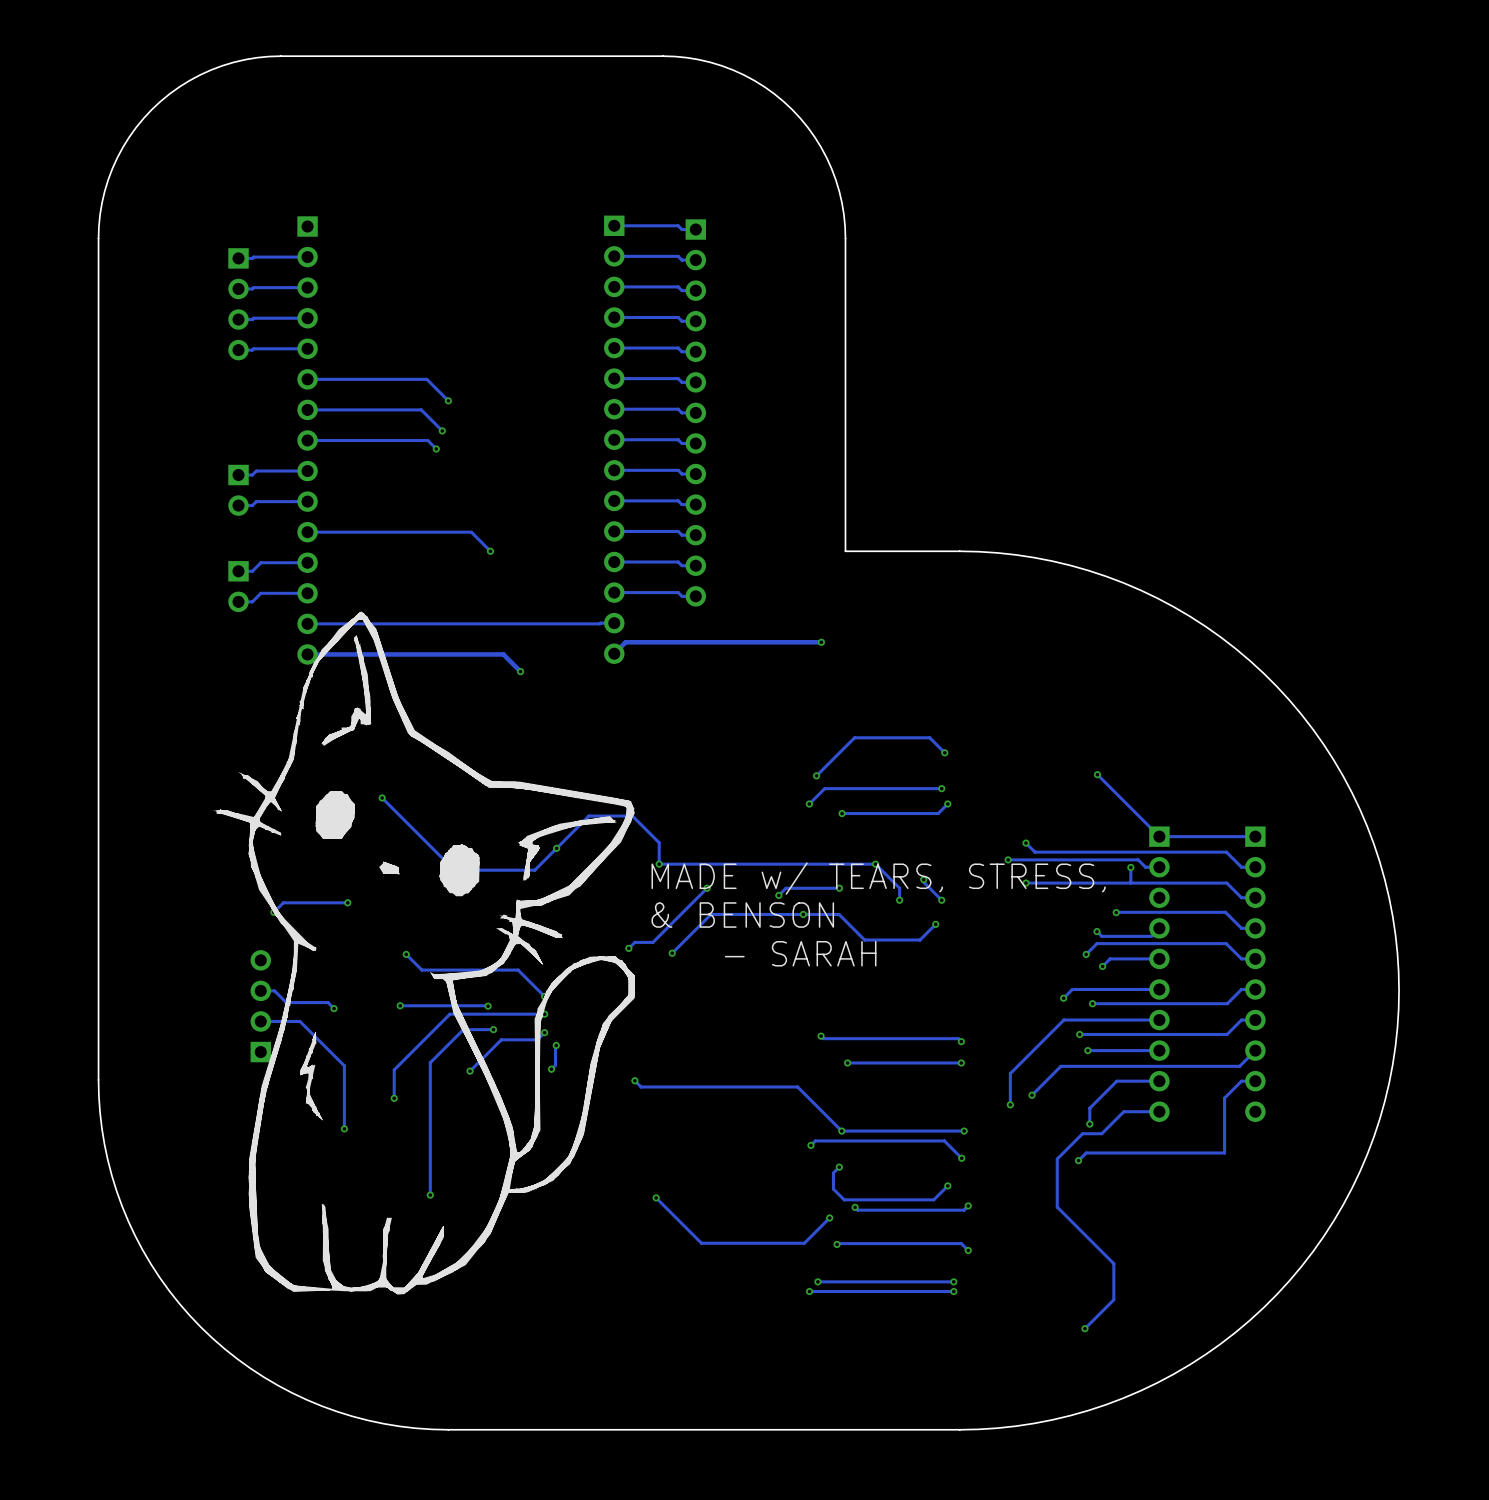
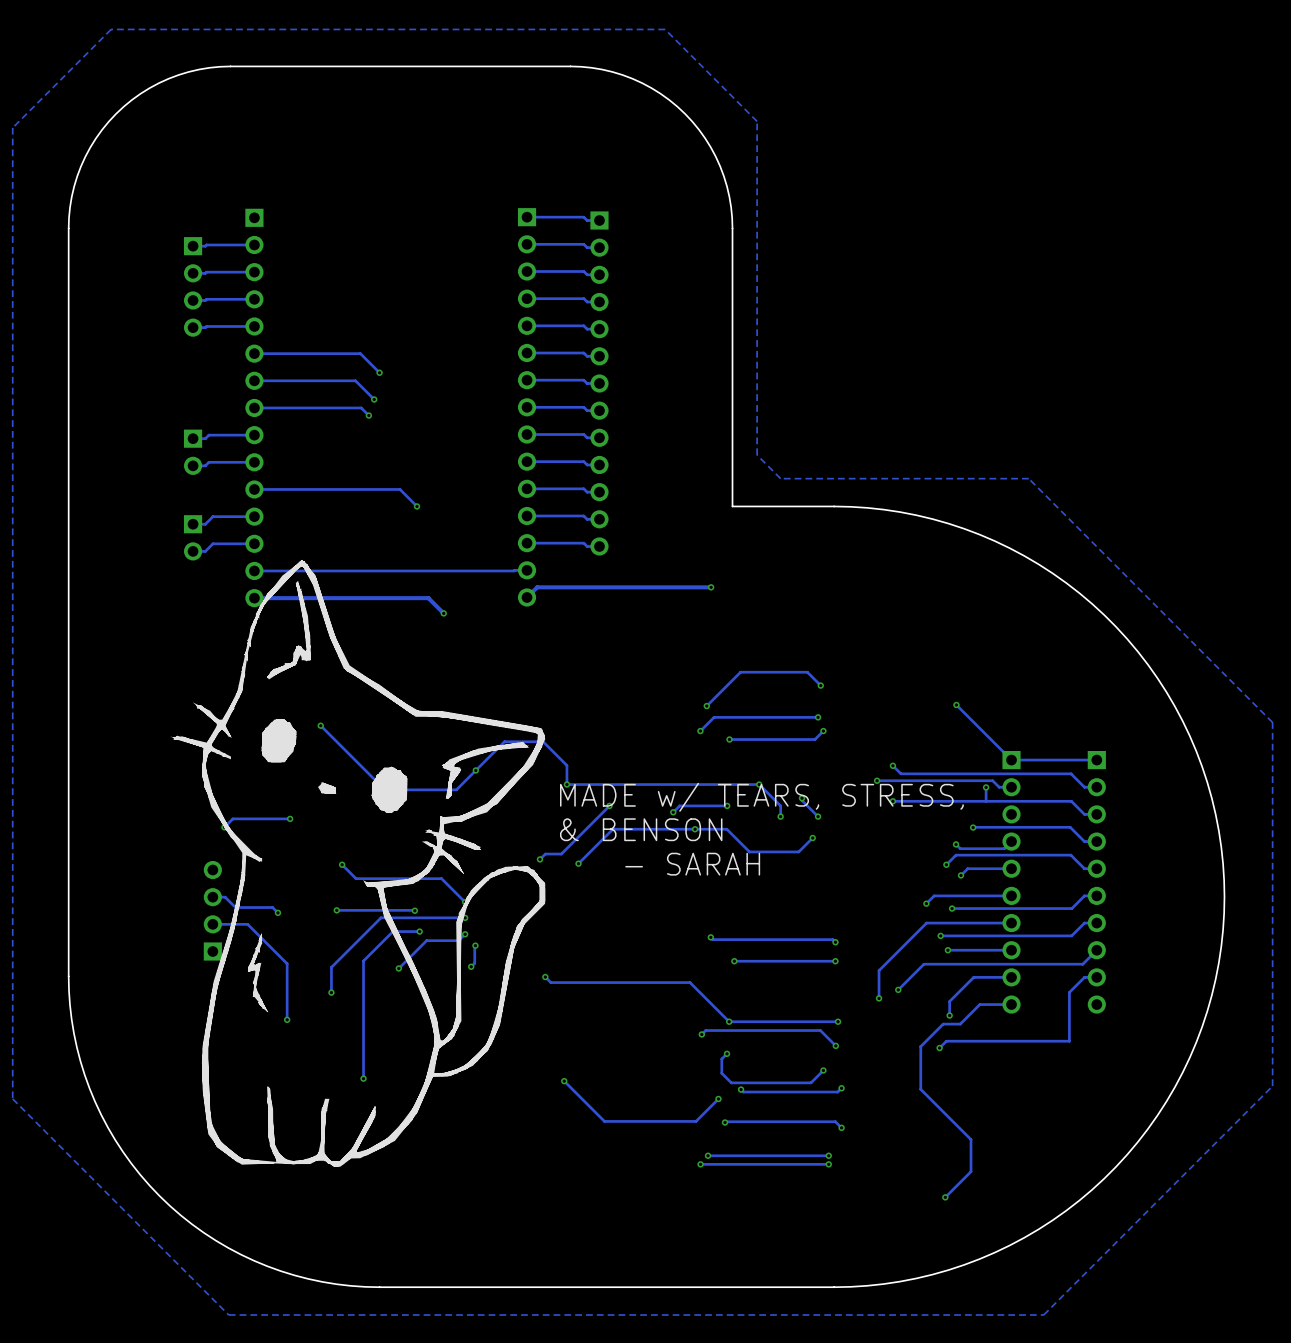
zone outline: none -> (665, 29) (757, 121) (757, 455) (780, 478) (1028, 478) (1272, 722) (1272, 1086) (1043, 1315) (228, 1315) (12, 1098) (12, 127) (111, 29) (665, 29)

